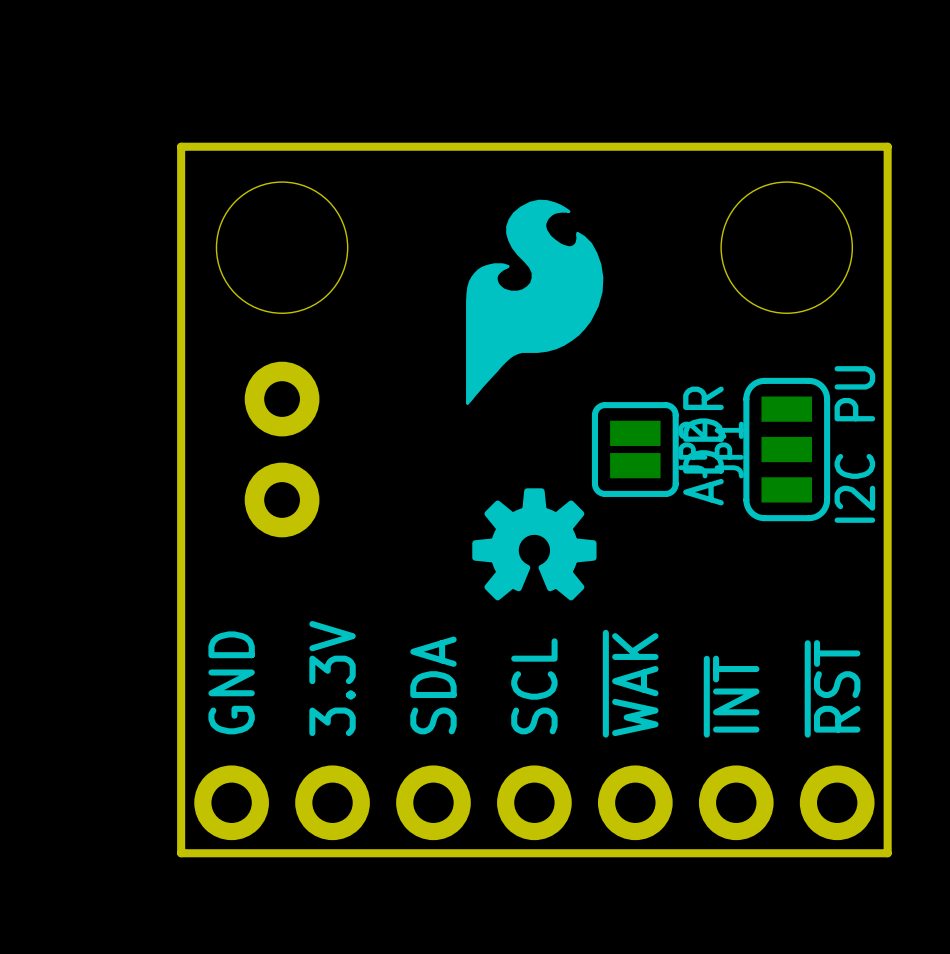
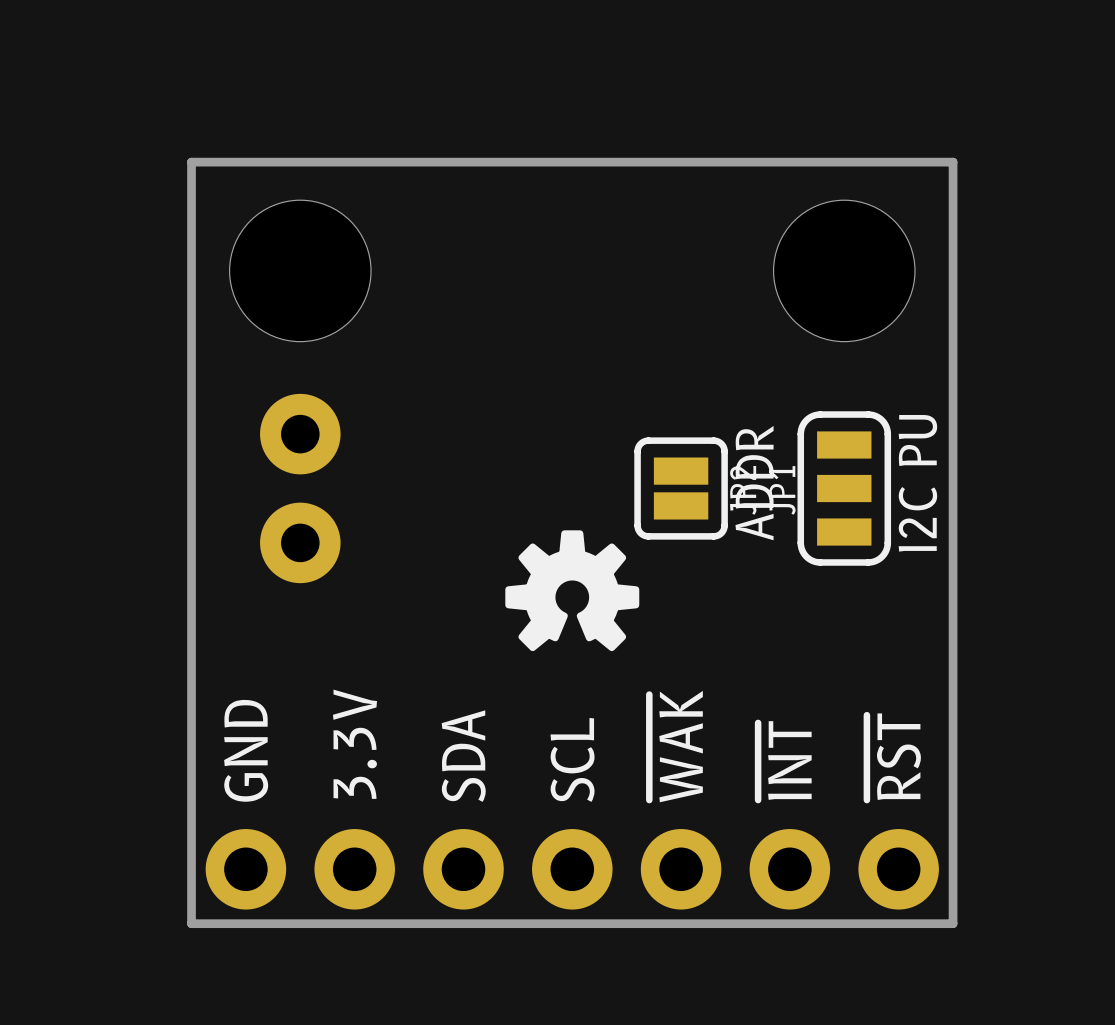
drawing: [466, 199, 604, 405] -> none

